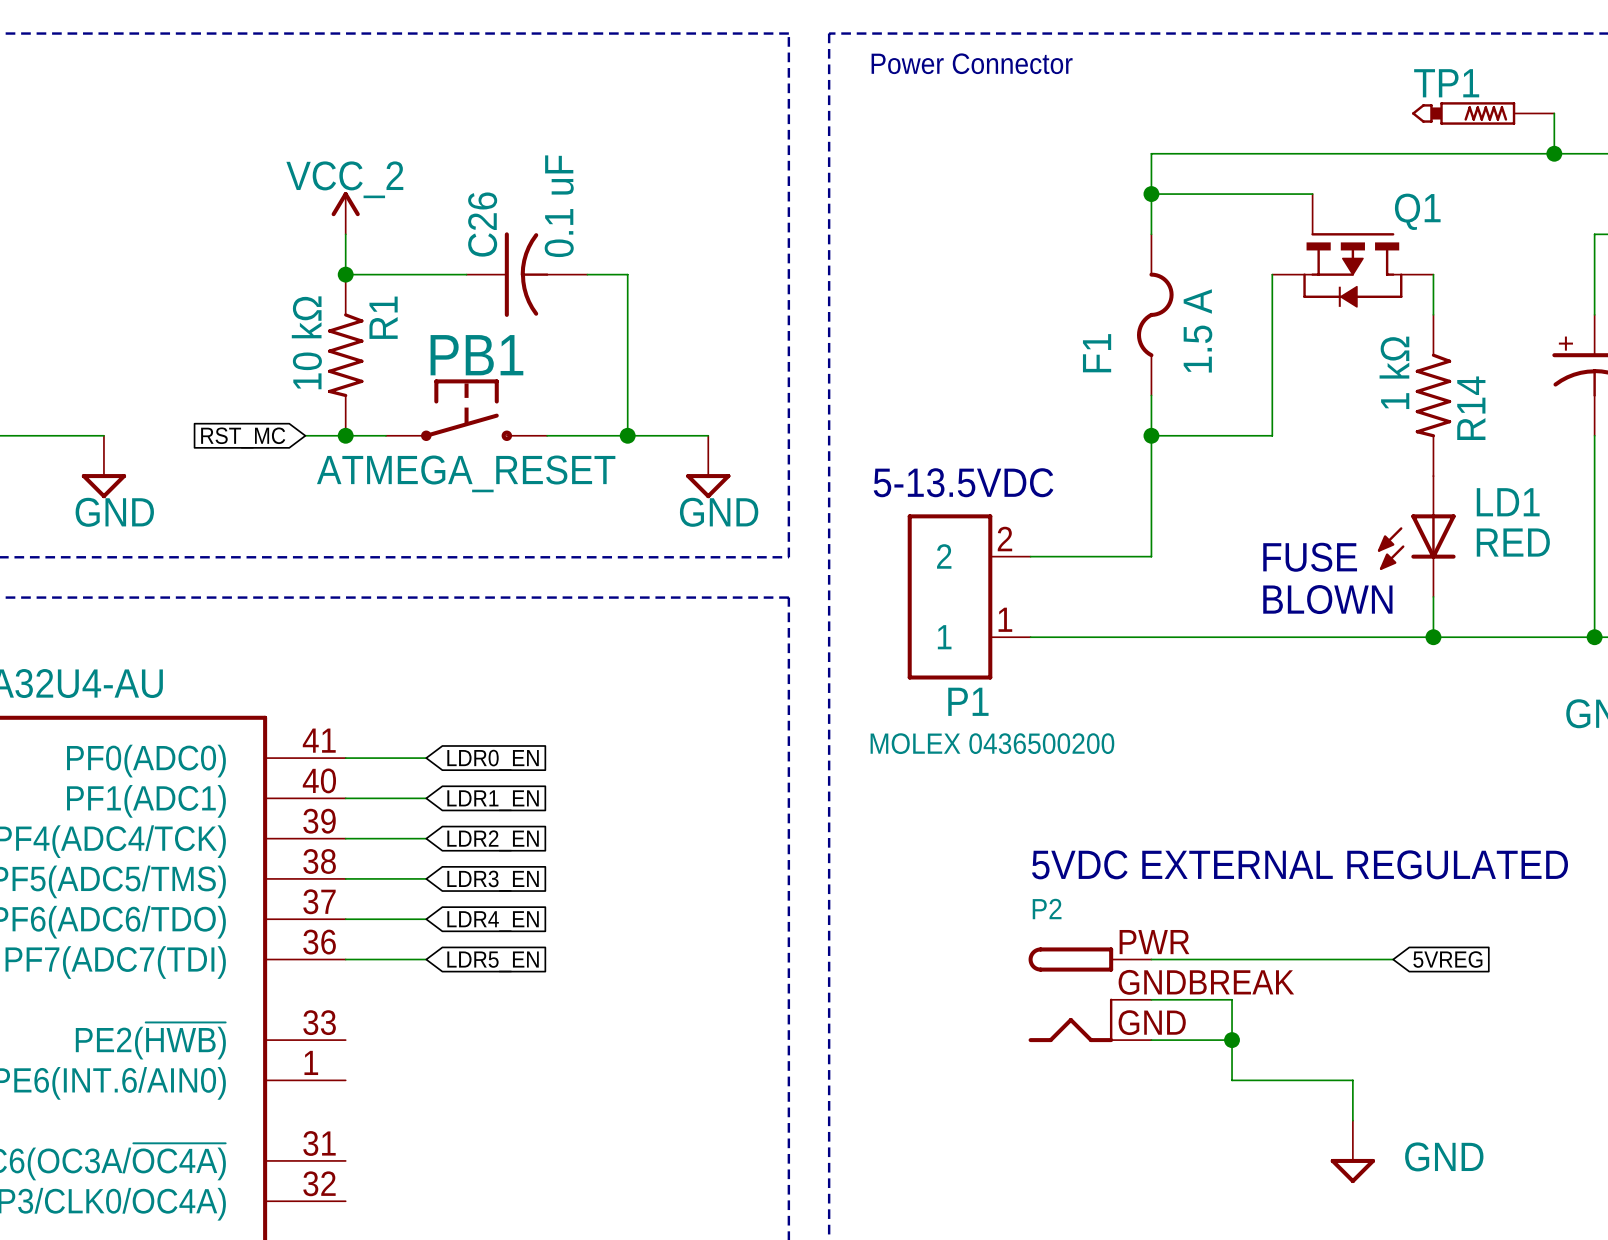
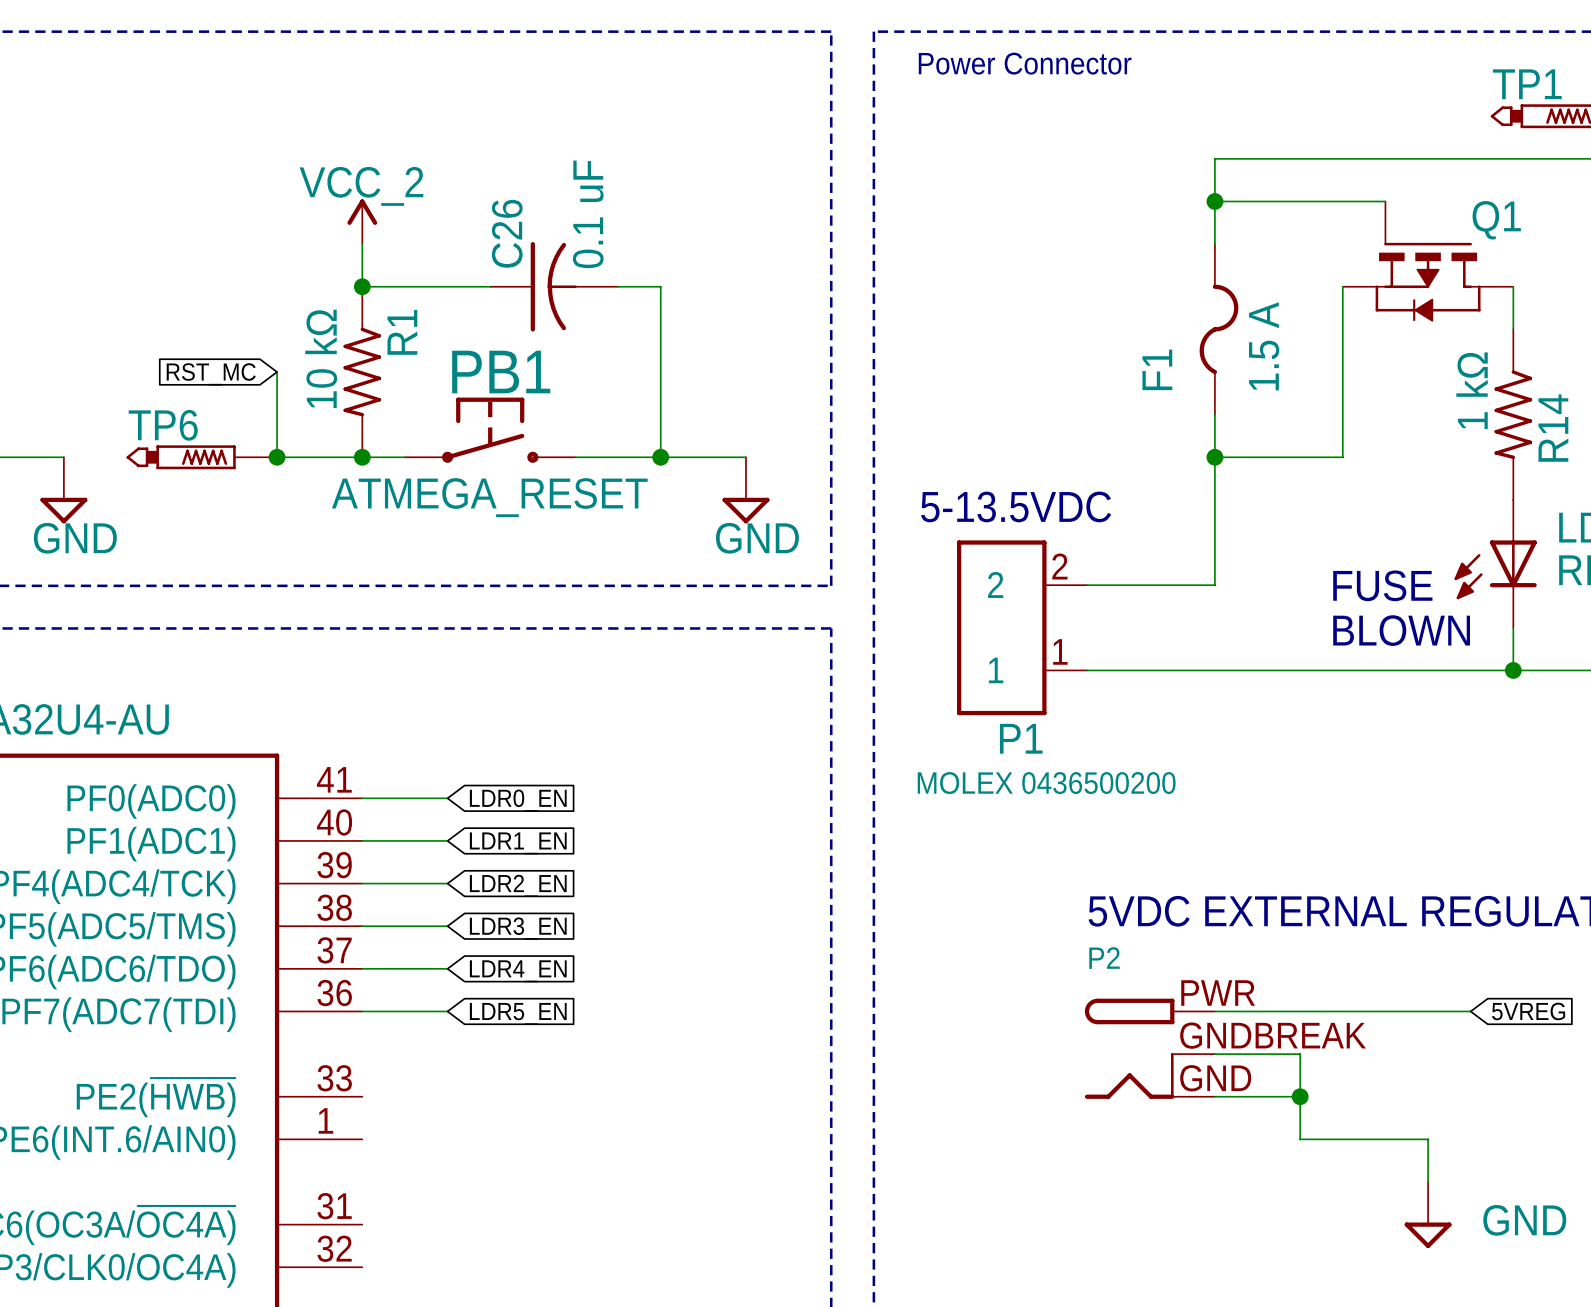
wire: none -> (277, 372) (277, 457) (319, 457)
wire: (63, 435) (103, 435) -> none
TP6: none -> (201, 457)
junction: none -> (277, 457)
global label position: RST_MC (243, 437) -> RST_MC (211, 374)
power symbol position: GND (103, 467) -> GND (63, 490)

